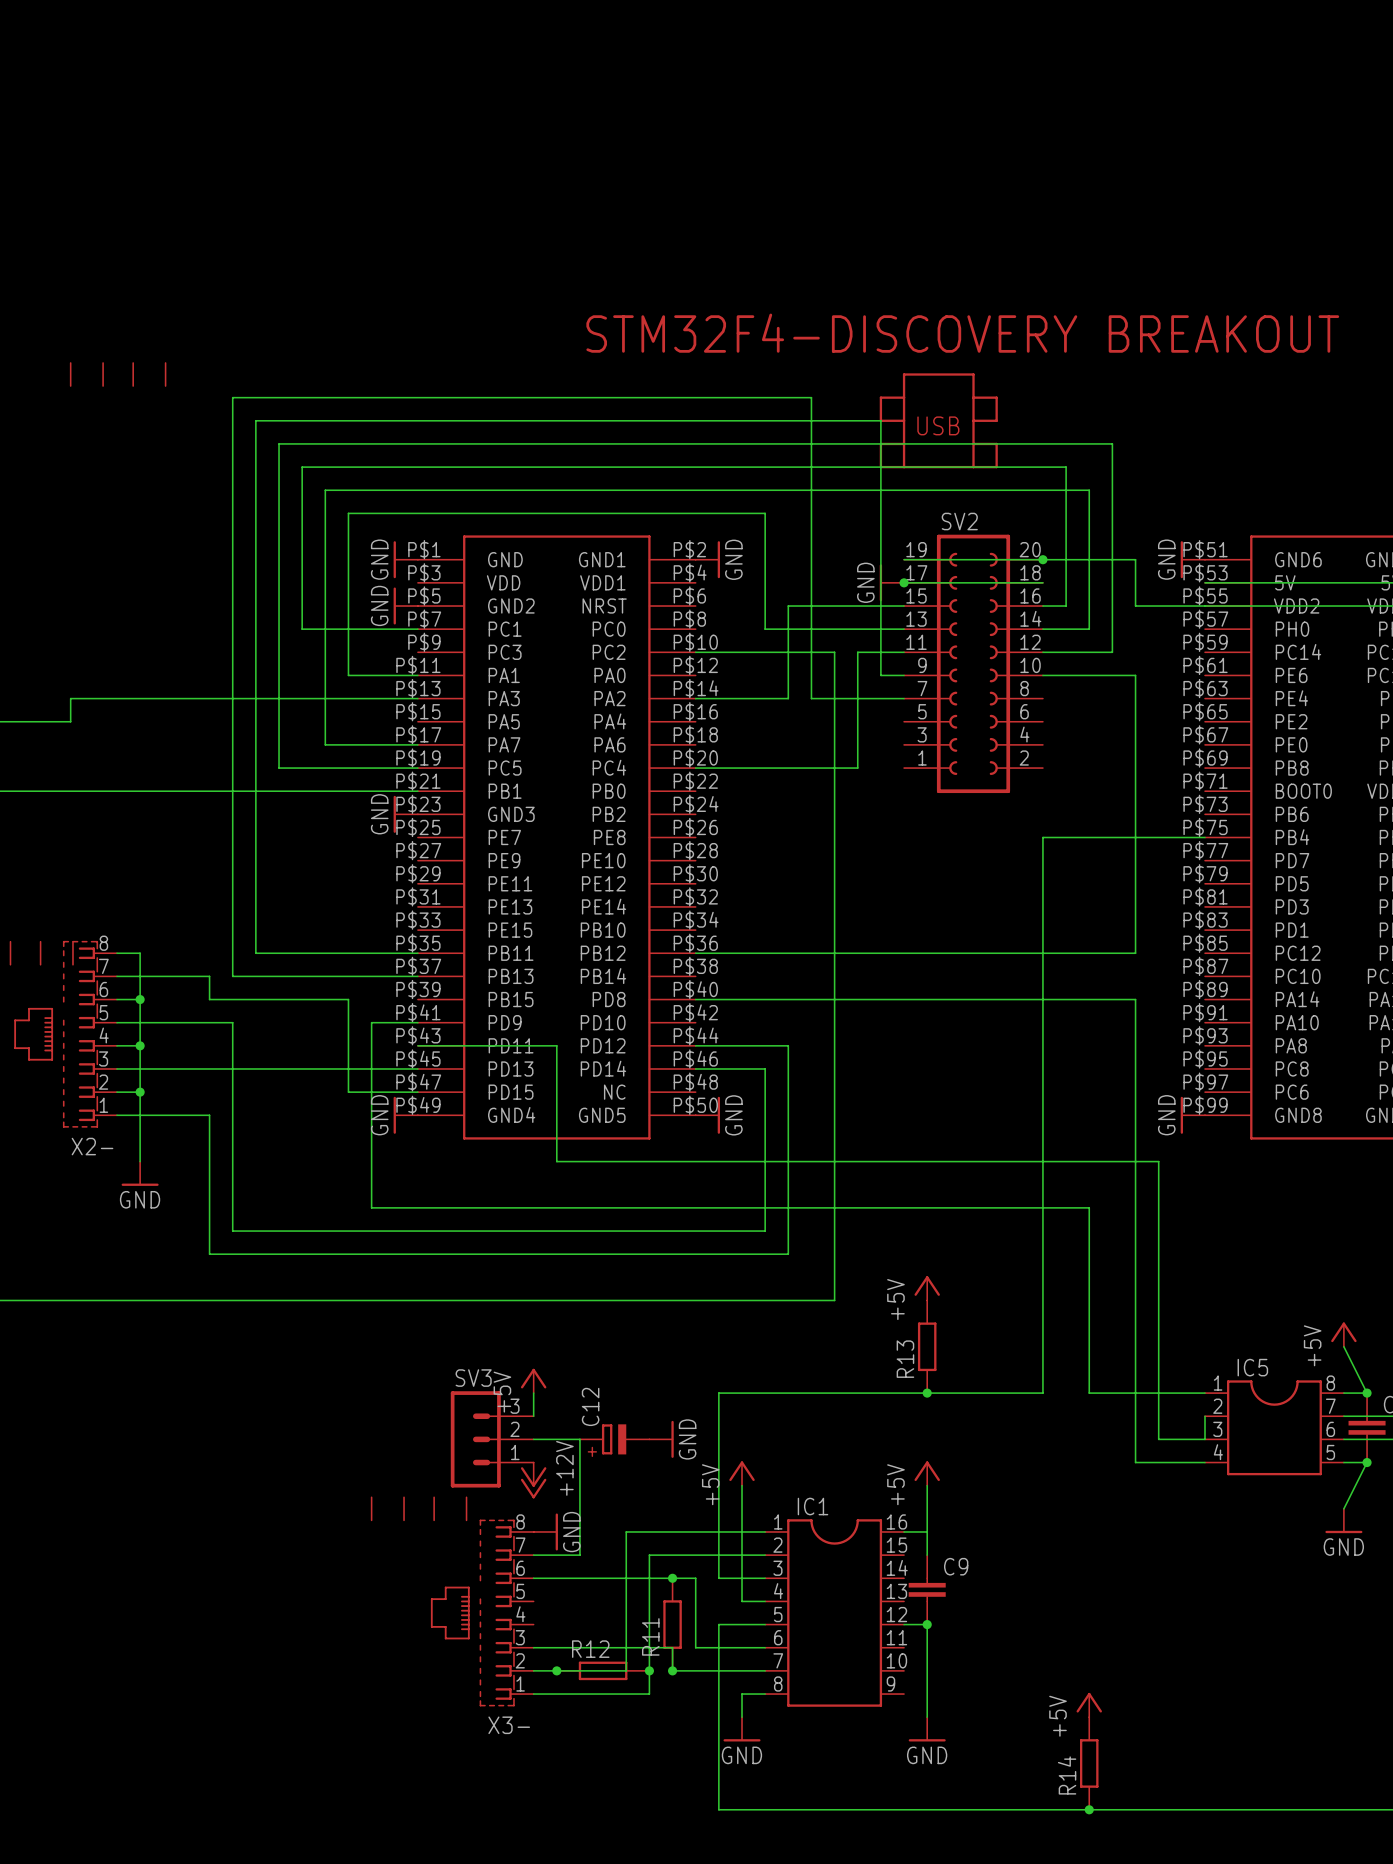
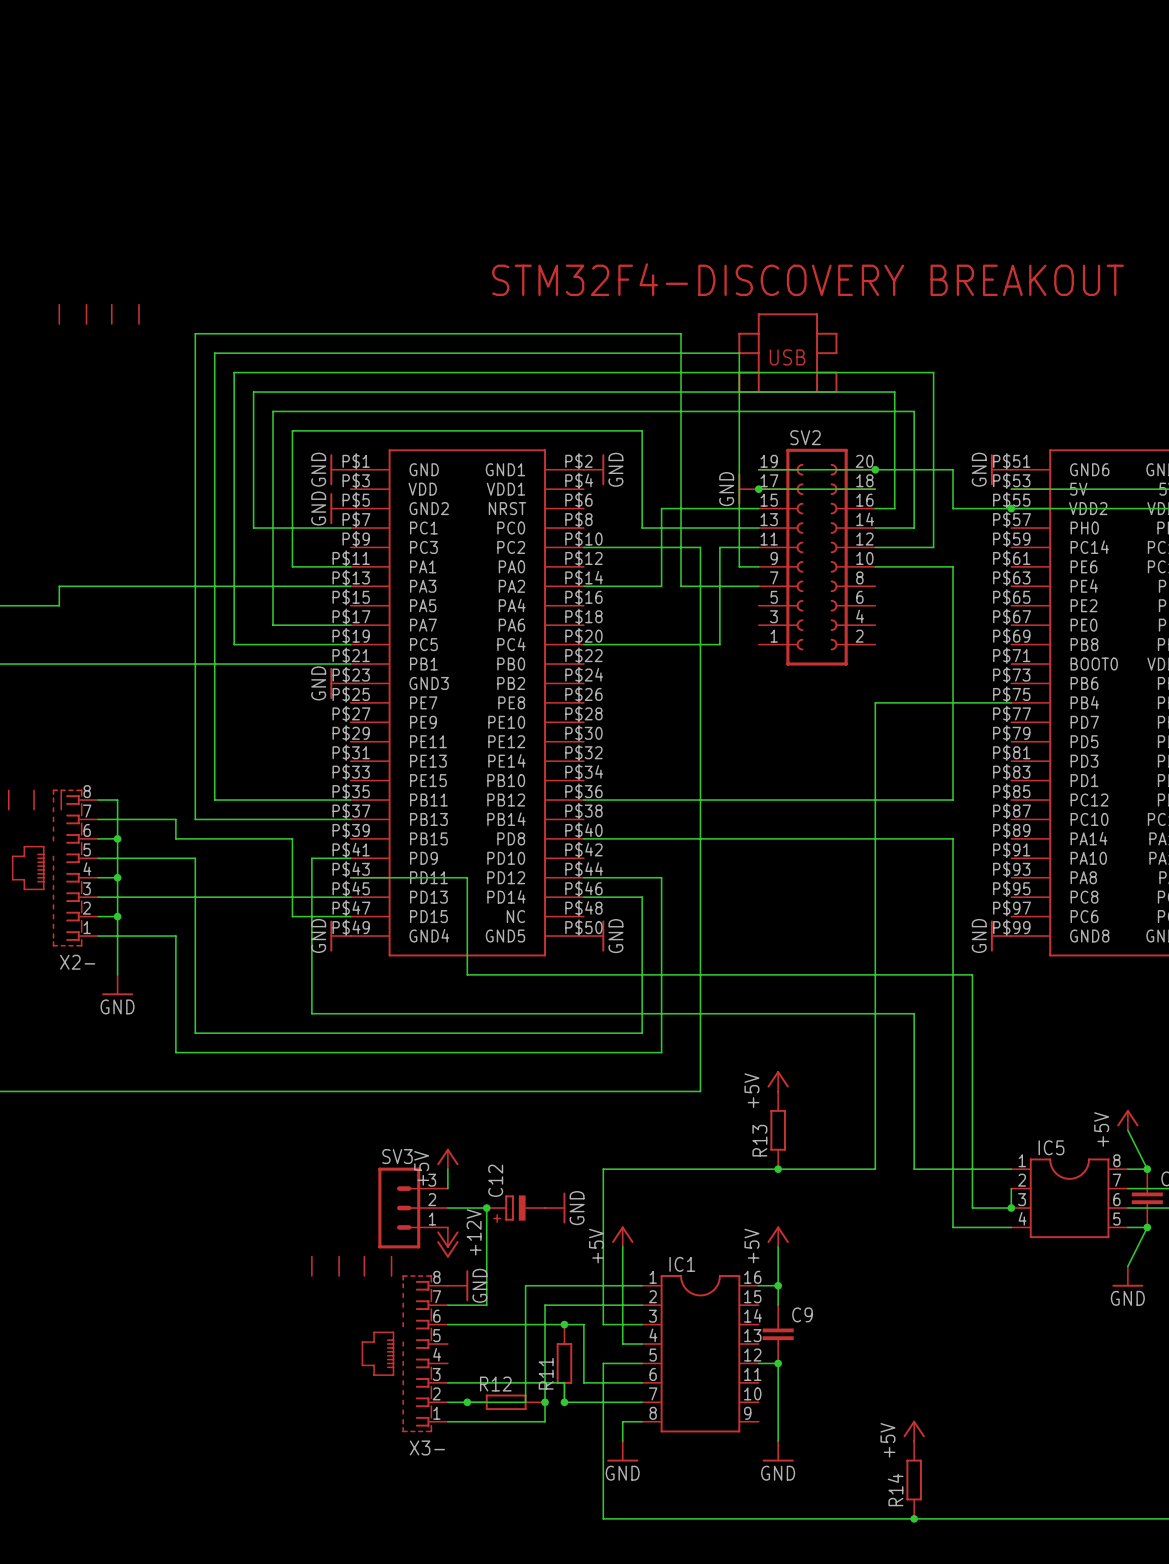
junction: none -> (1011, 508)
junction: none -> (486, 1208)
junction: none -> (1011, 1208)
junction: none -> (778, 1285)

